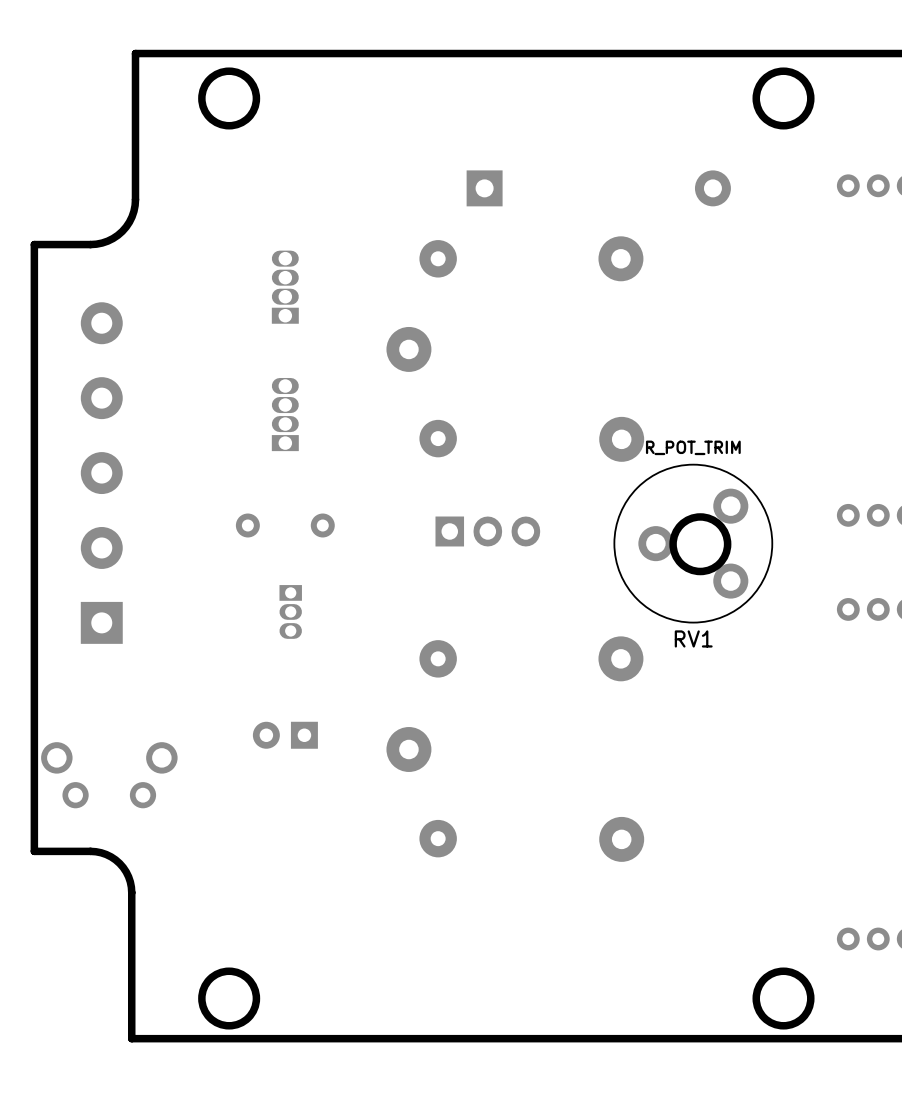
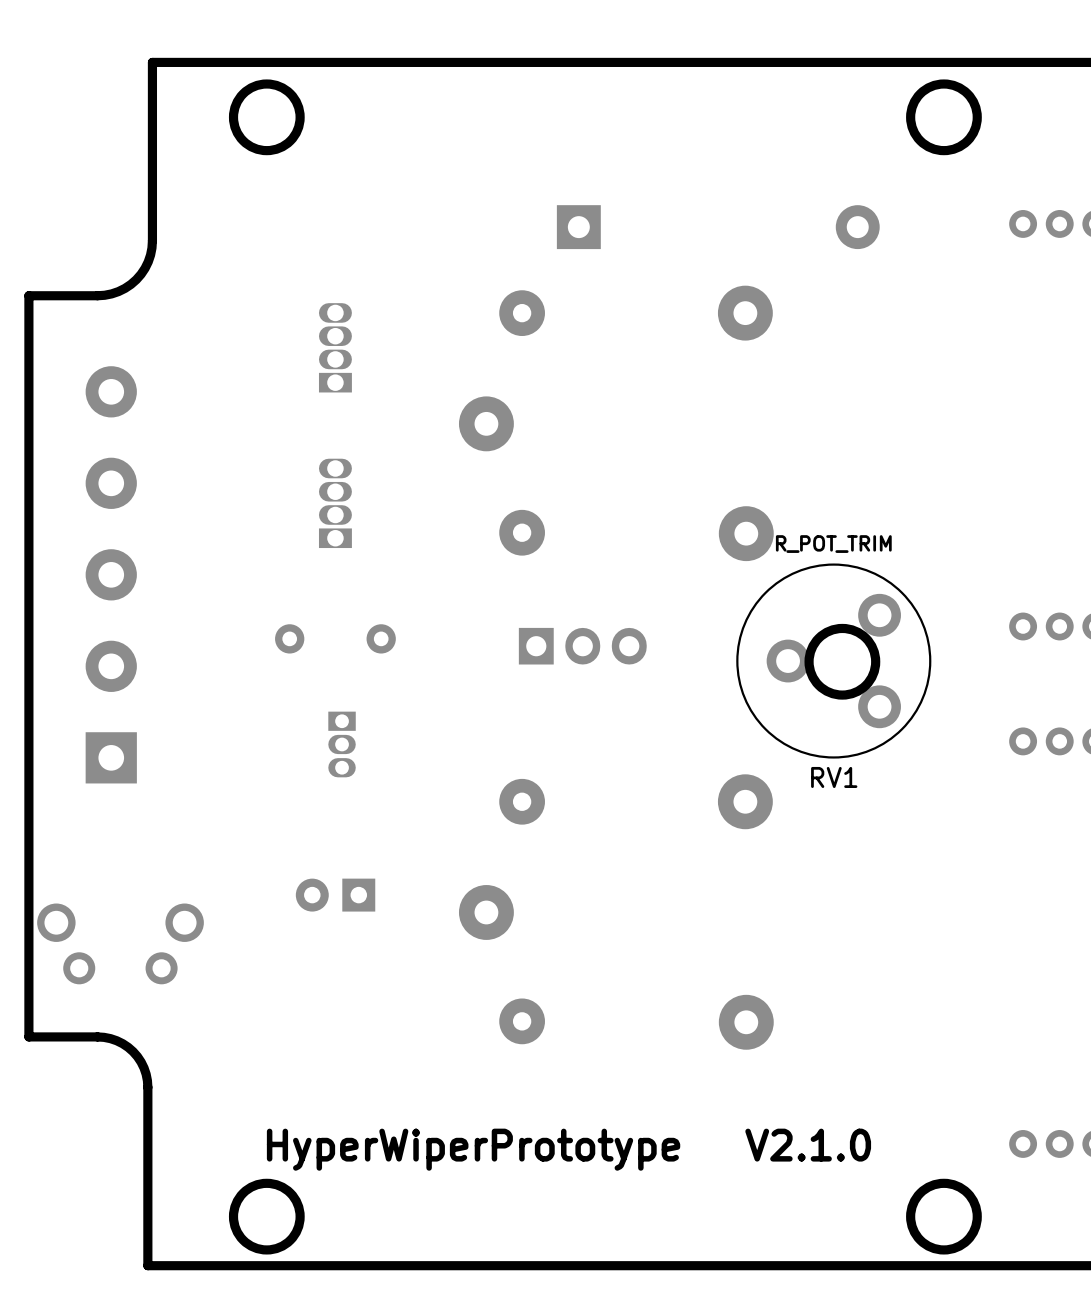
text: none -> HyperWiperPrototype V2.1.0 (568, 1149)

